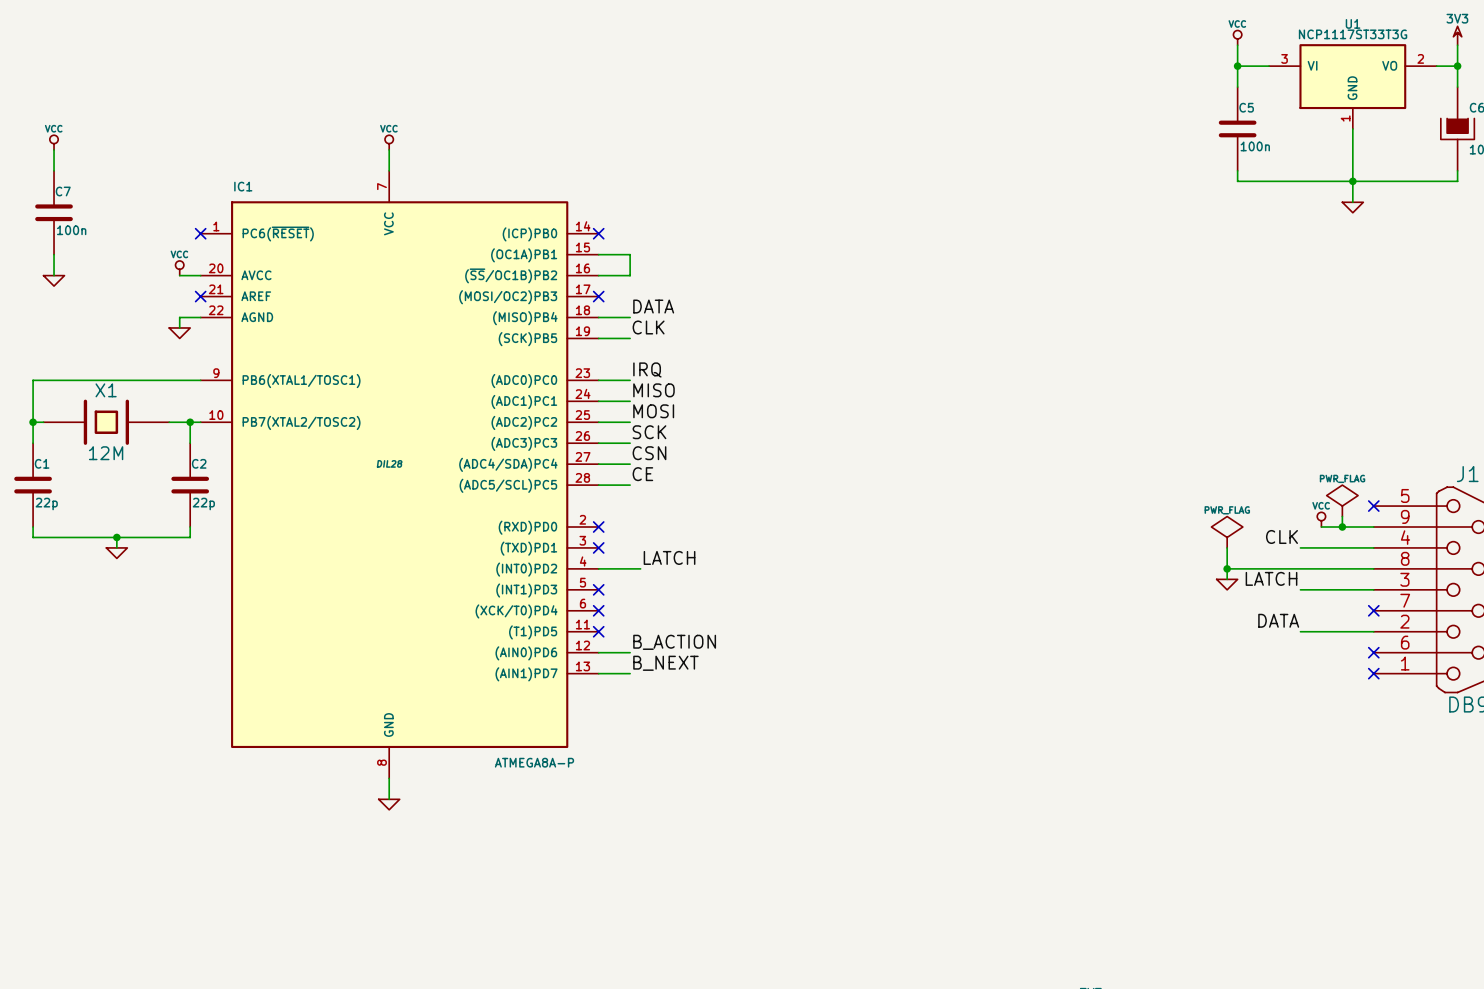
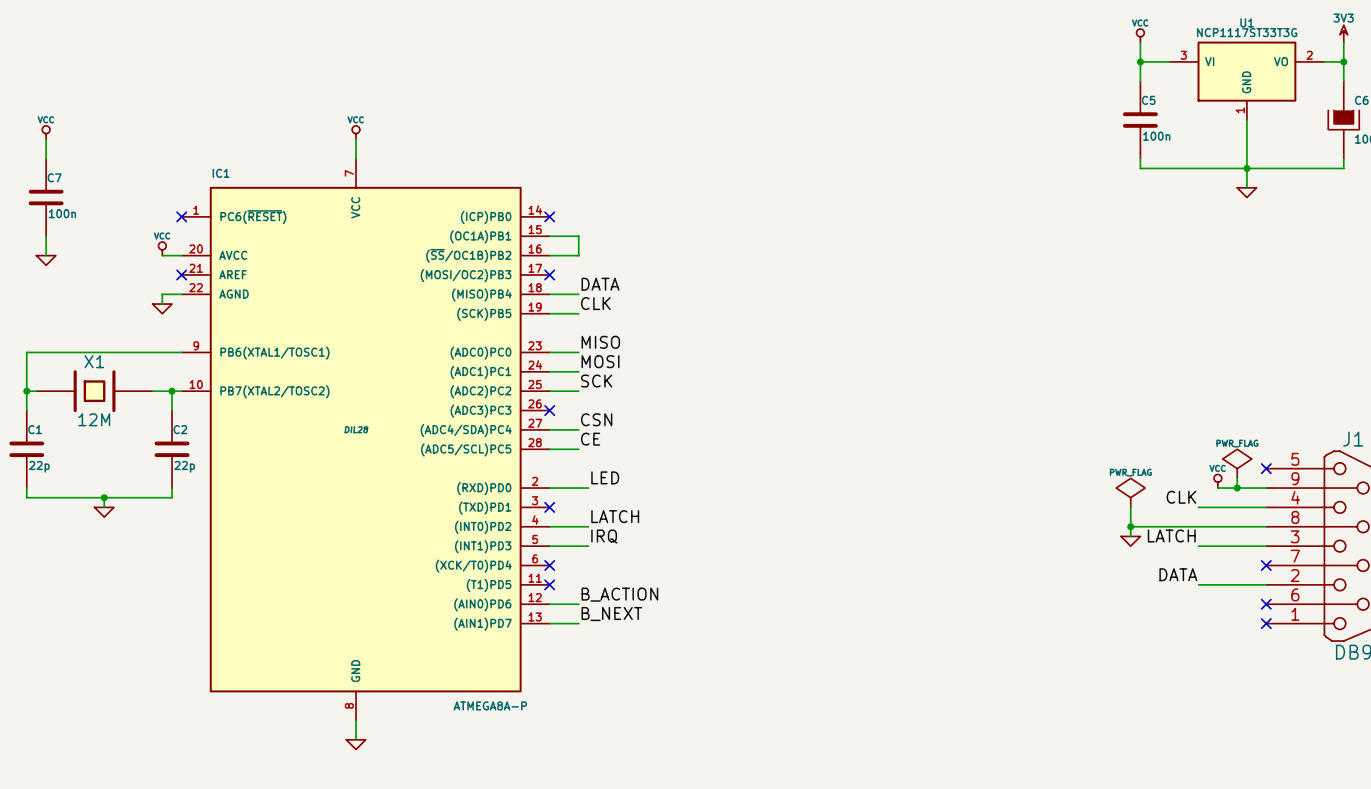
label: IRQ (647, 369) -> MISO (600, 342)
label: MISO (653, 390) -> MOSI (600, 361)
label: MOSI (653, 411) -> SCK (596, 381)
label: SCK (649, 432) -> none
wire: (598, 443) (630, 443) -> none
no-connect mark: none -> (549, 410)
label: none -> LED (605, 477)
wire: none -> (549, 488) (588, 488)
no-connect mark: (598, 527) -> none
label: none -> IRQ (604, 536)
wire: none -> (549, 546) (588, 546)
no-connect mark: (598, 589) -> none

